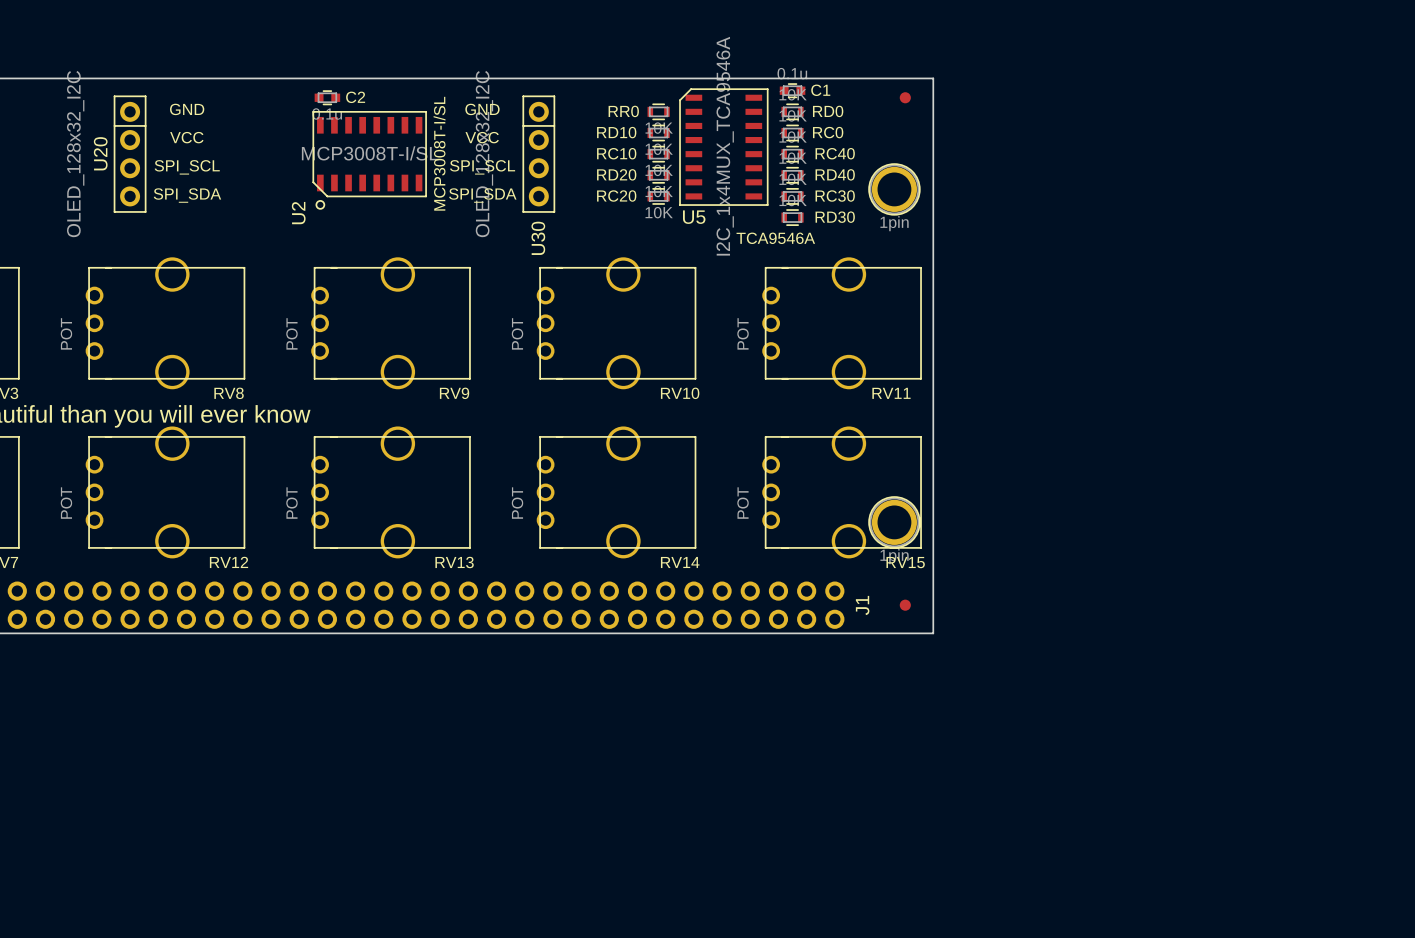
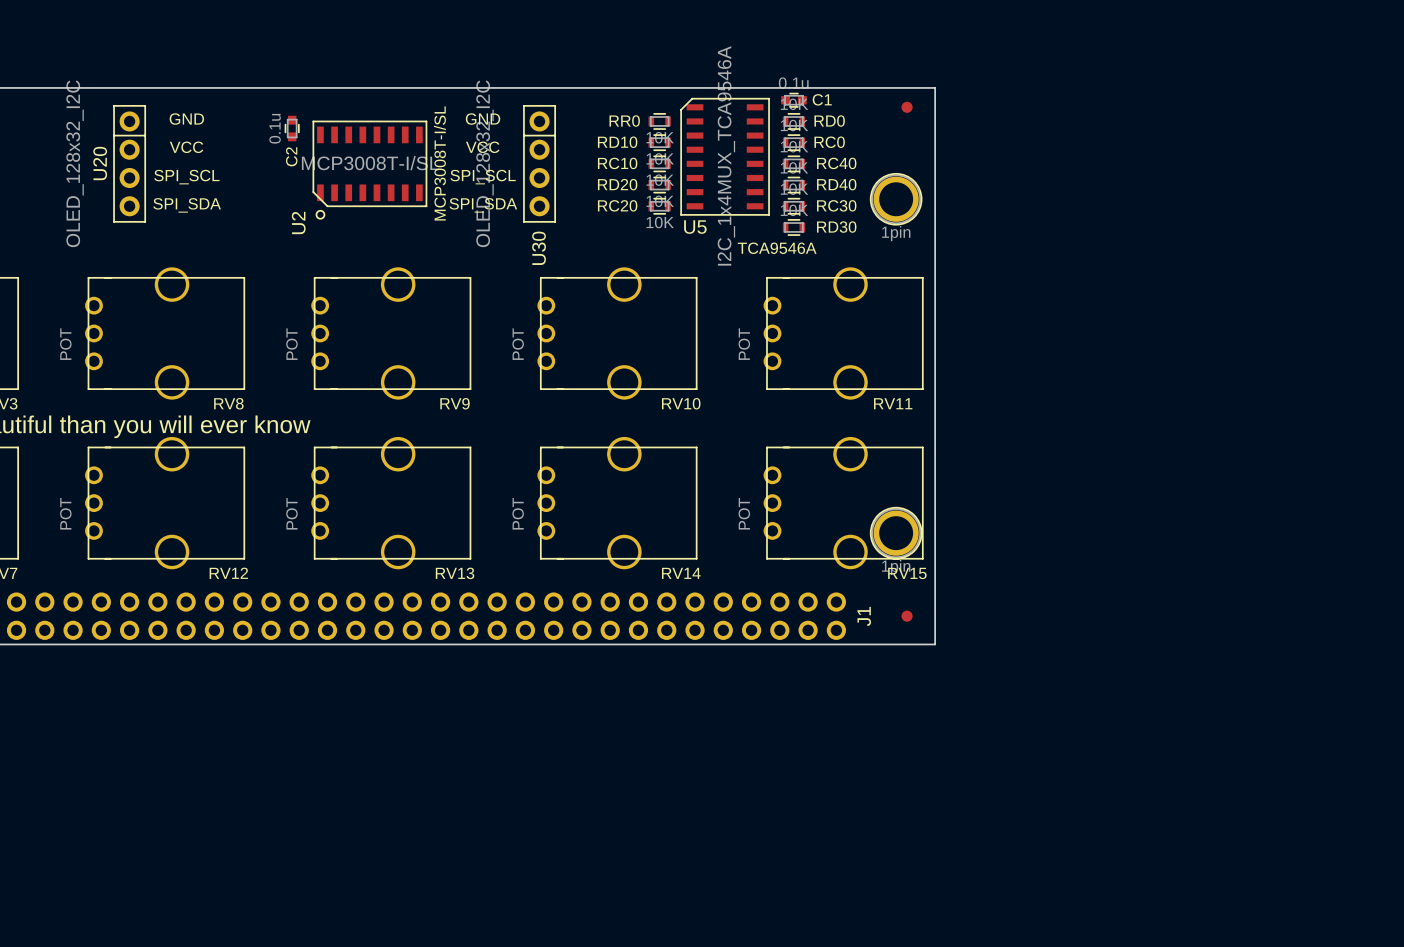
C2 rotation: 0° (327, 97) -> 90° clockwise (292, 128)
C2 position: (327, 97) -> (292, 128)

